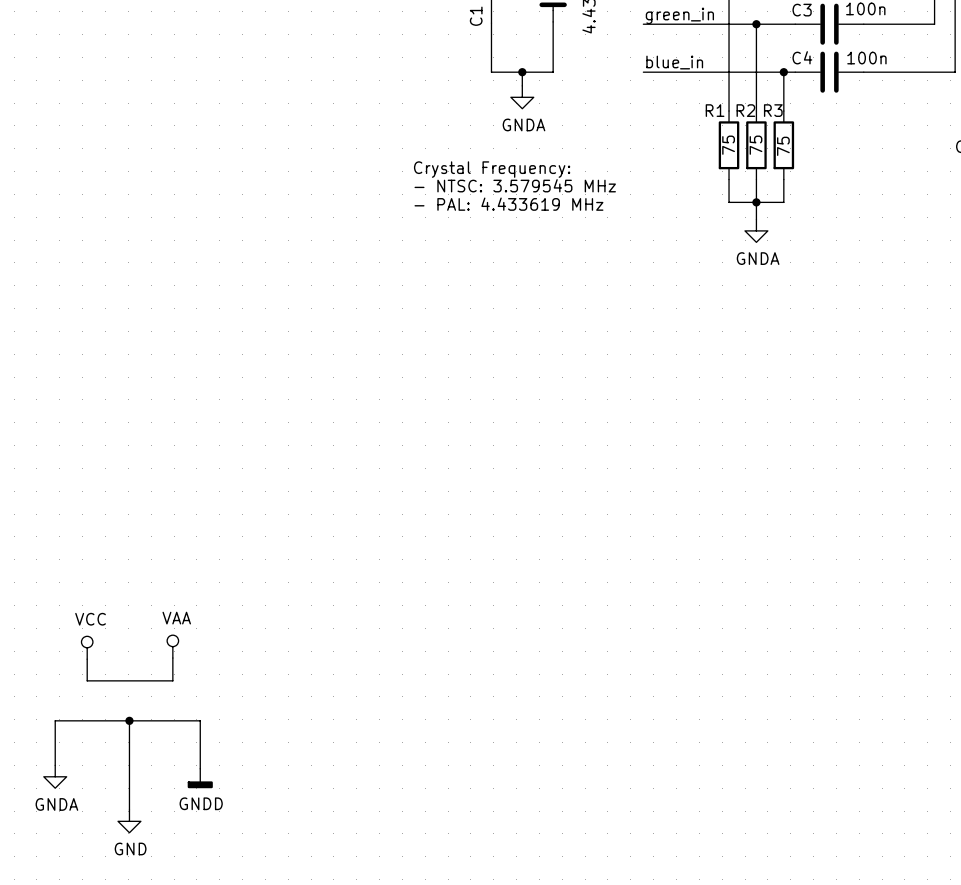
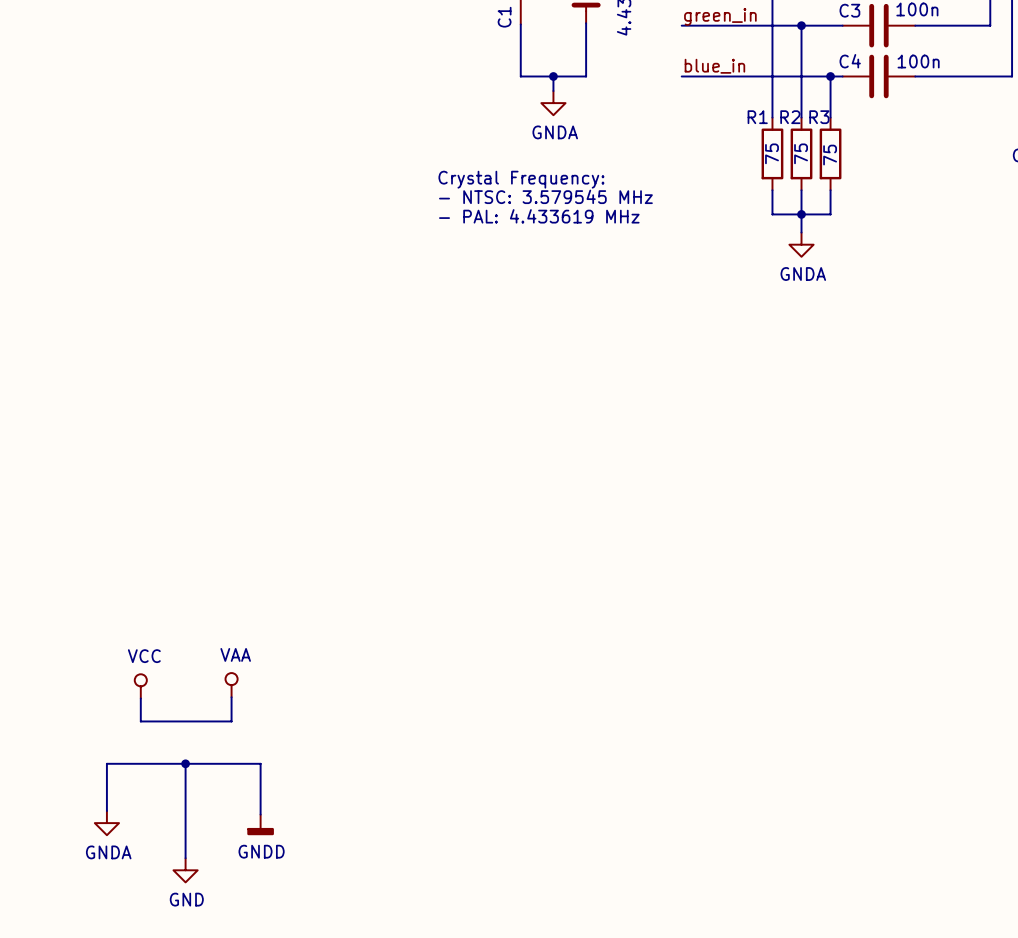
power symbol position: VAA (172, 646) -> VAA (231, 685)
power symbol position: VCC (87, 647) -> VCC (140, 686)
wire: (172, 658) (172, 680) -> (231, 697) (231, 721) (183, 721)
wire: (87, 659) (87, 680) (132, 680) -> (140, 698) (140, 721)
wire: (100, 720) (55, 720) (55, 765) -> (106, 763) (106, 811)
wire: (129, 720) (129, 809) -> (185, 763) (185, 858)
junction position: (129, 720) -> (185, 763)
wire: (200, 720) (200, 768) -> (212, 763) (260, 763) (260, 814)
power symbol position: GNDA (55, 776) -> GNDA (106, 823)
power symbol position: GNDD (200, 778) -> GNDD (260, 824)
power symbol position: GND (129, 821) -> GND (185, 870)

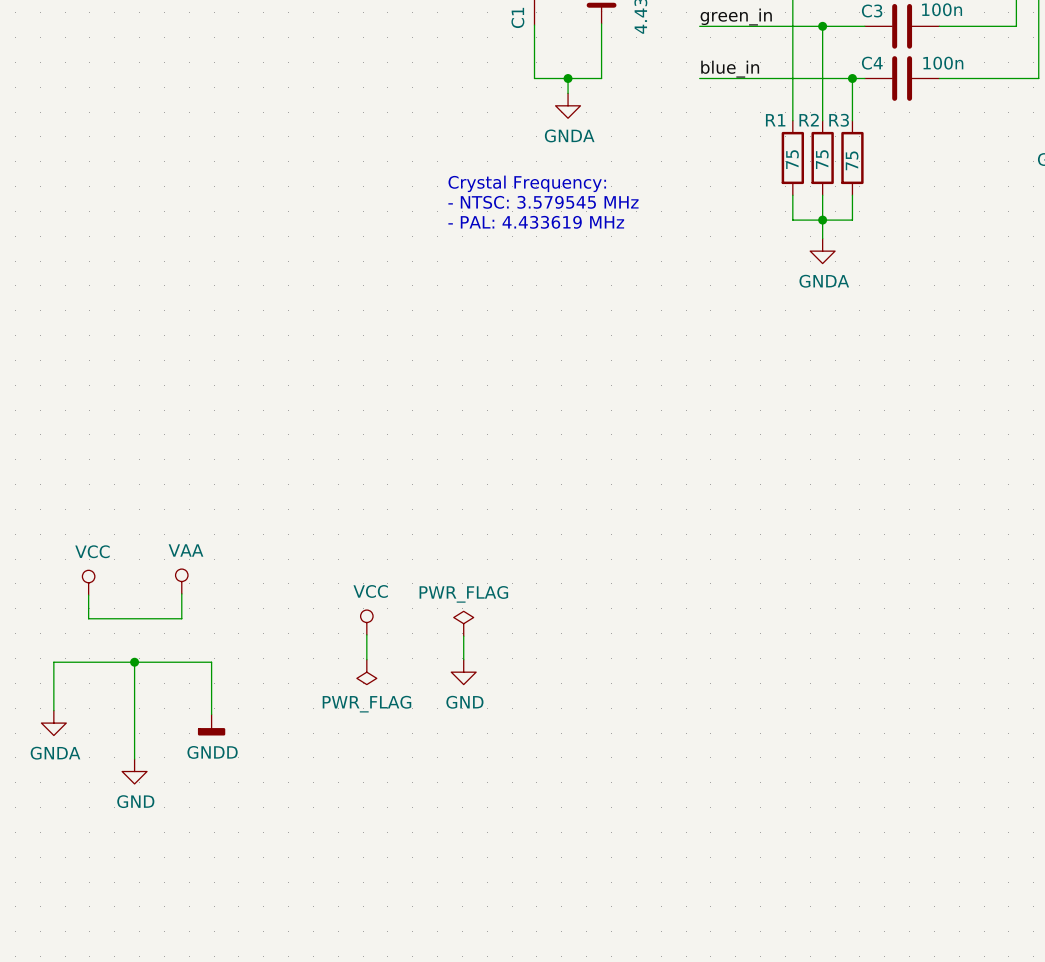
power symbol: none -> VCC (88, 582)
power symbol: none -> VCC (366, 622)
power symbol: none -> PWR_FLAG (463, 623)
wire: none -> (366, 634) (366, 659)
wire: none -> (463, 636) (463, 659)
junction: none -> (134, 662)
power symbol: none -> PWR_FLAG (366, 672)
power symbol: none -> GND (463, 672)
power symbol position: VAA (231, 685) -> VAA (181, 581)
power symbol: VCC (140, 686) -> none
wire: (231, 697) (231, 721) (140, 721) (140, 698) -> (181, 593) (181, 618) (88, 618) (88, 595)
wire: (185, 763) (185, 858) -> (134, 662) (134, 759)
junction: (185, 763) -> none
wire: (106, 811) (106, 763) (260, 763) (260, 814) -> (53, 710) (53, 662) (211, 662) (211, 714)
power symbol position: GNDA (106, 823) -> GNDA (53, 723)
power symbol position: GNDD (260, 824) -> GNDD (211, 724)
power symbol position: GND (185, 870) -> GND (134, 771)

